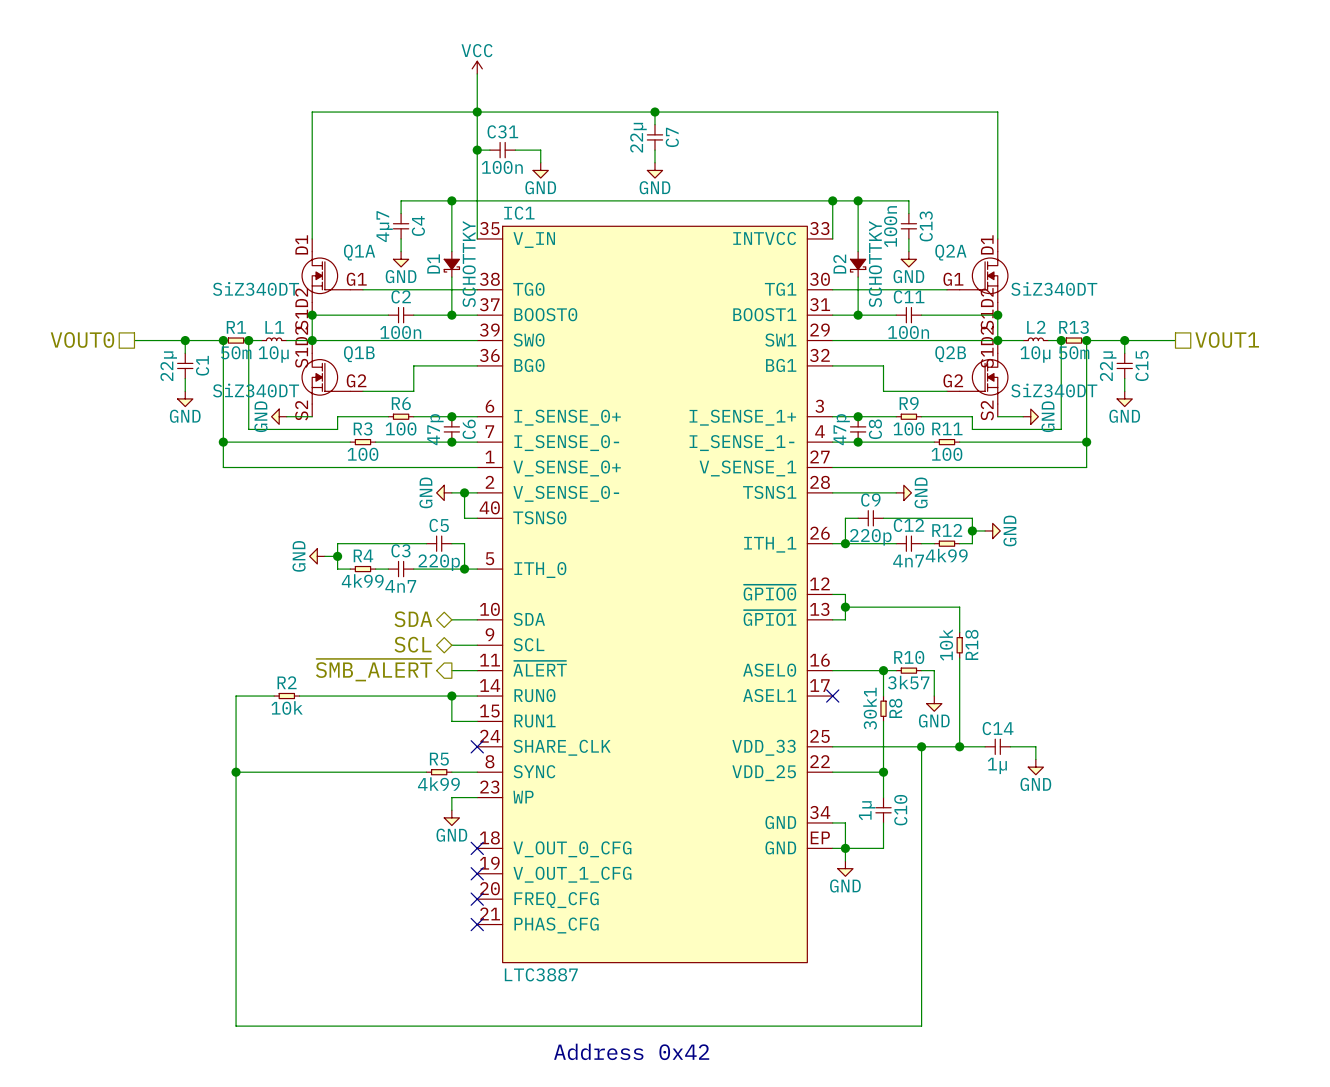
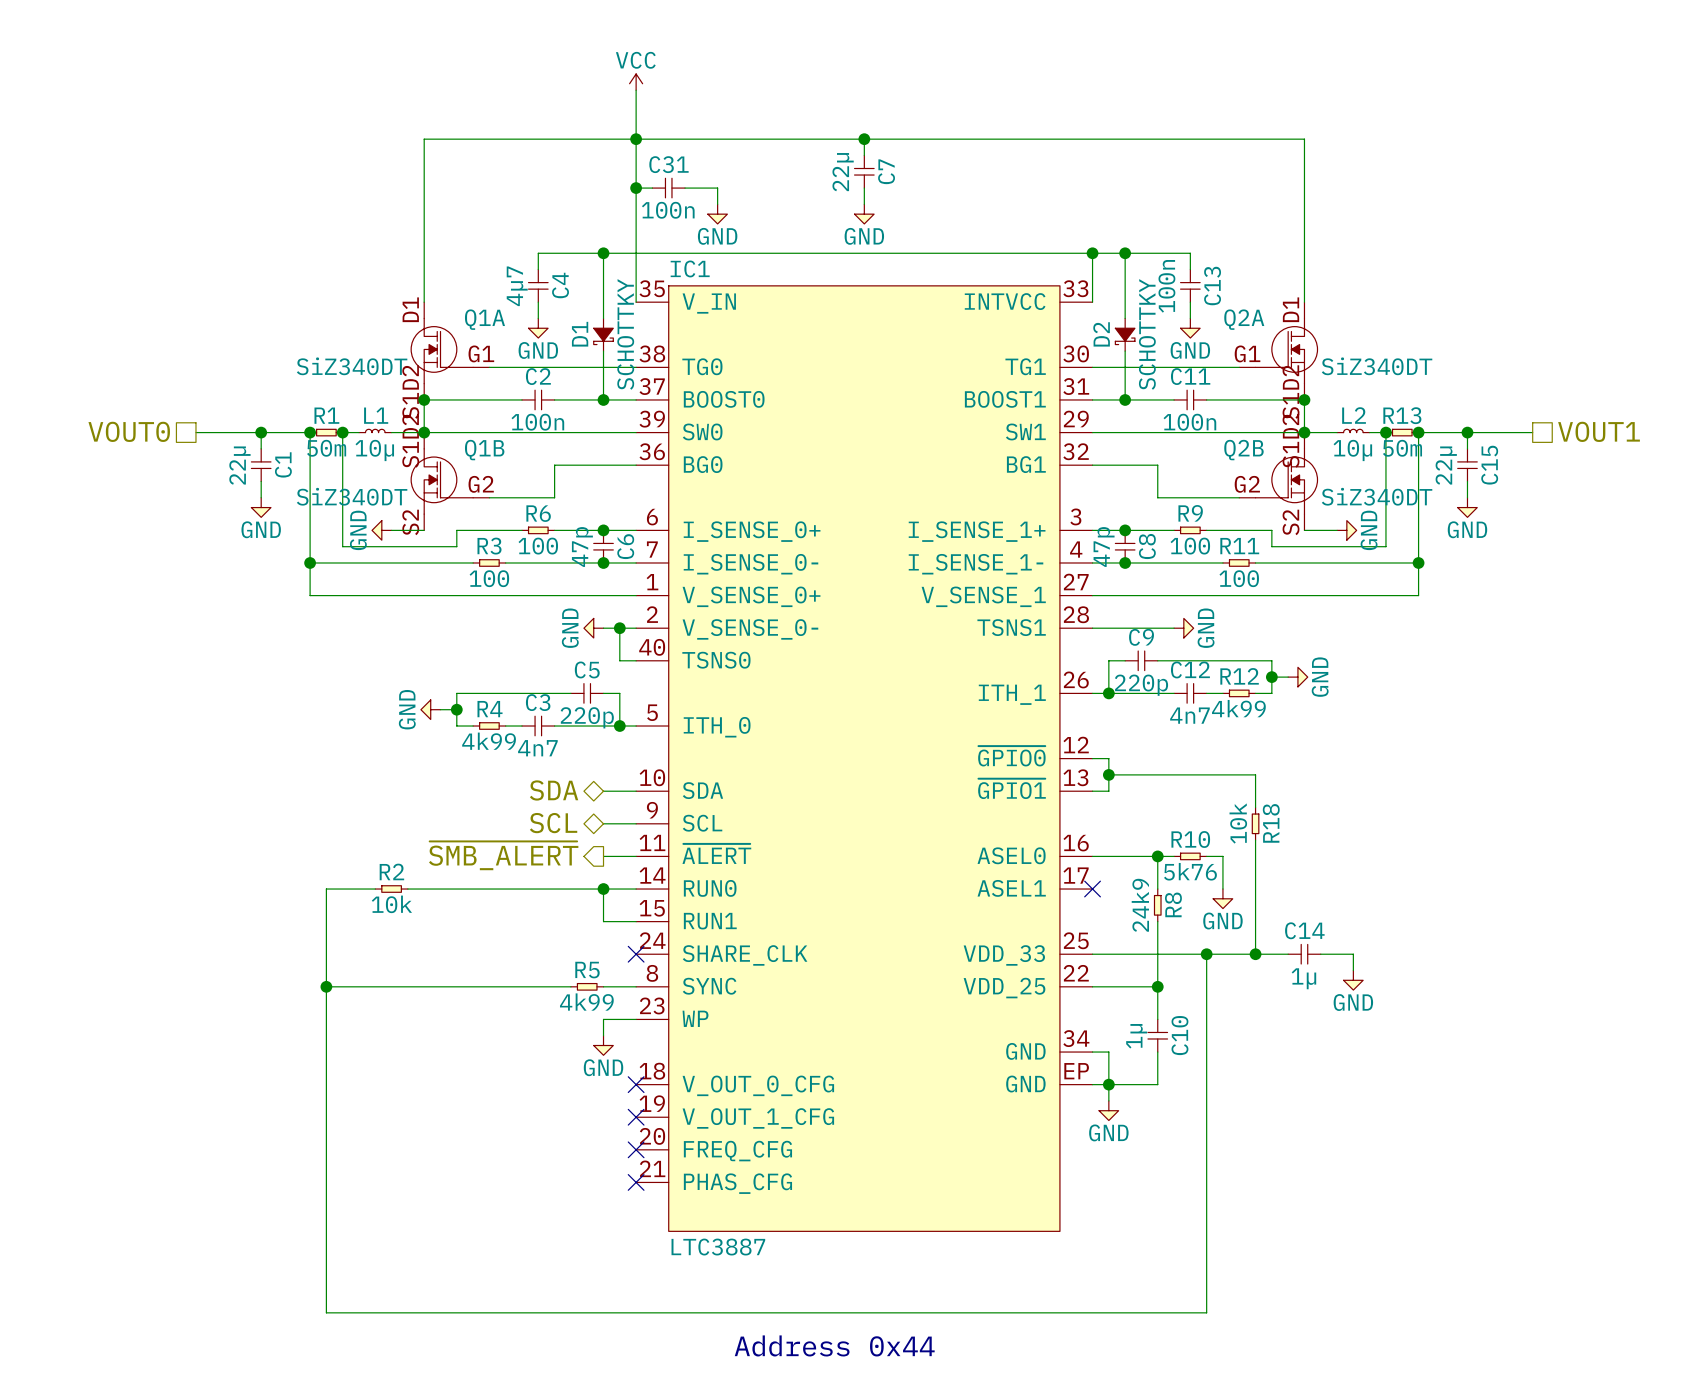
R10 value: 3k57 (908, 682) -> 5k76 (1190, 871)
R8 value: 30k1 (870, 708) -> 24k9 (1140, 905)
text: Address 0x42 (631, 1051) -> Address 0x44 (834, 1345)

